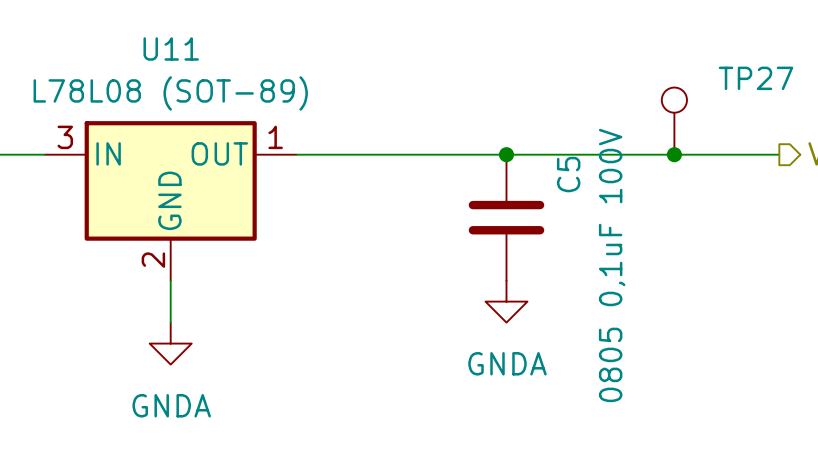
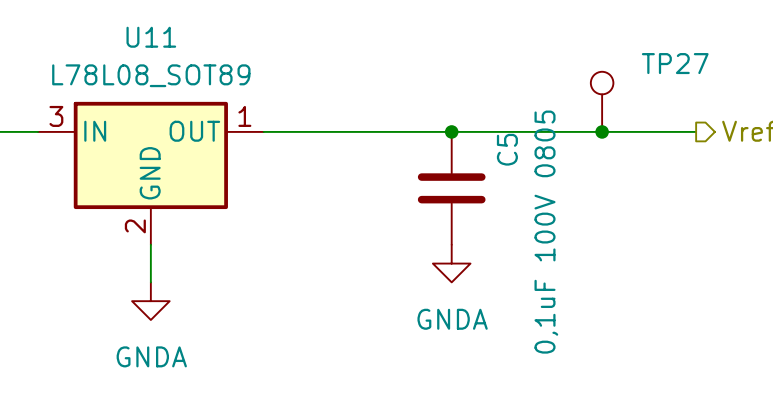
U11 value: L78L08 (SOT-89) (170, 93) -> L78L08_SOT89 (151, 75)
C5 value: 0805 0,1uF 100V (612, 265) -> 0,1uF 100V 0805 (546, 232)

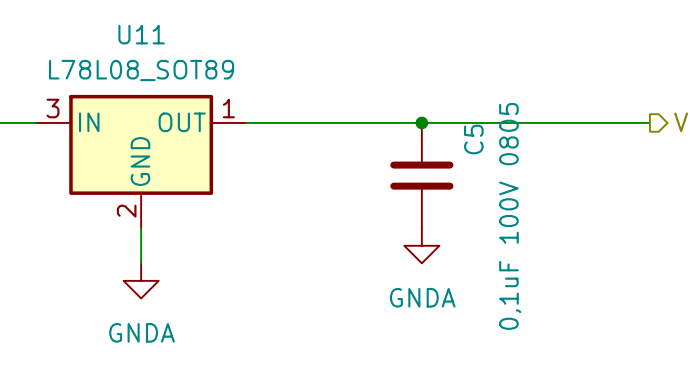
TP27: (602, 101) -> none
junction: (602, 131) -> none

